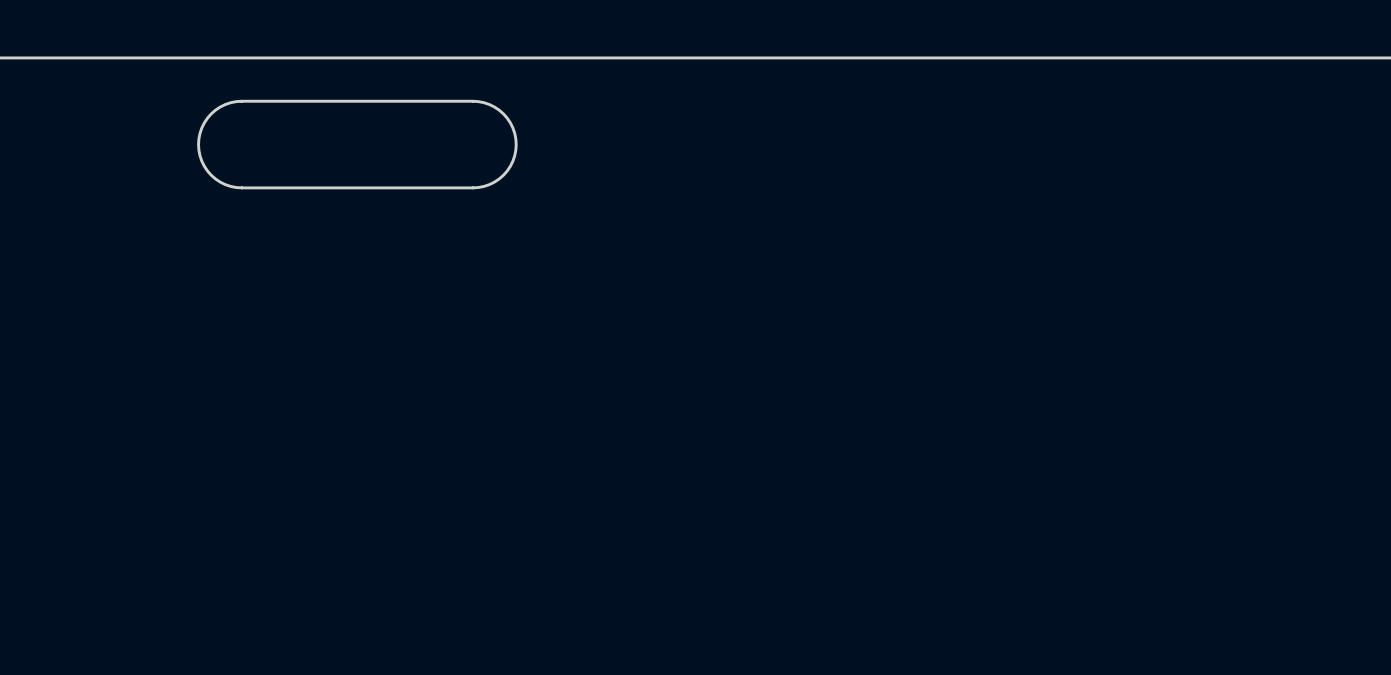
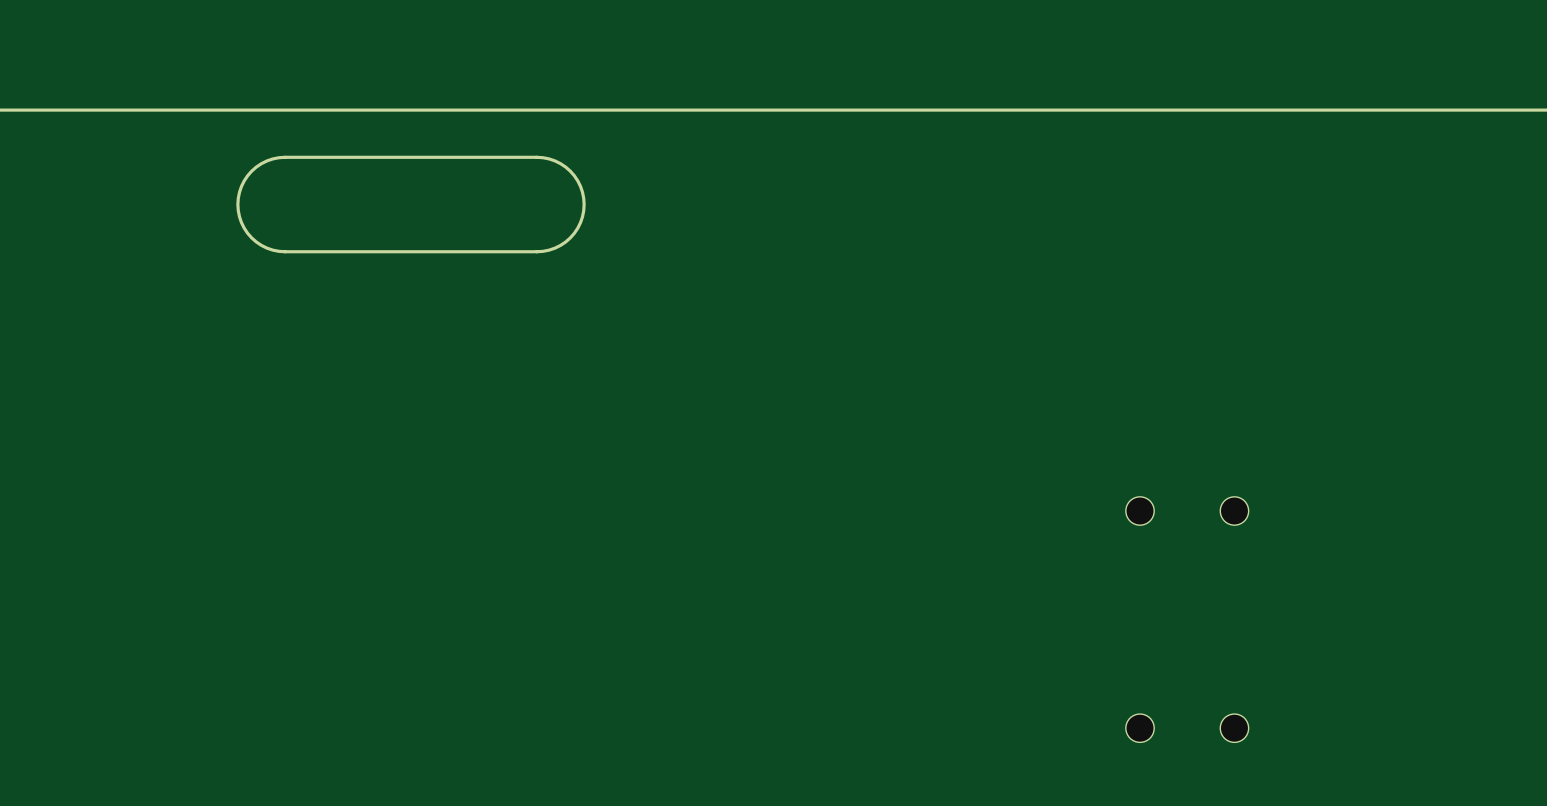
part: none -> (1187, 511)
part: none -> (1187, 728)

